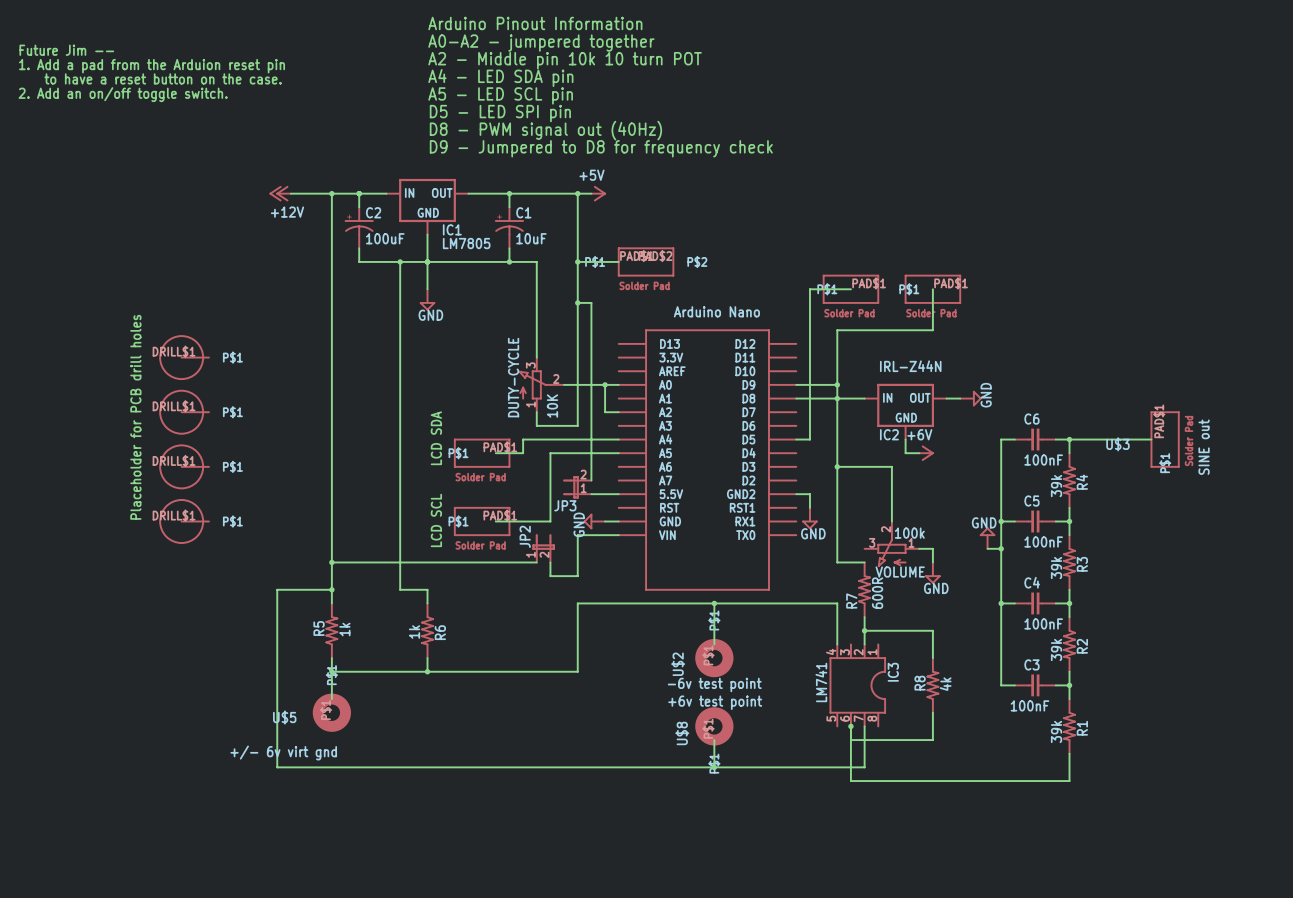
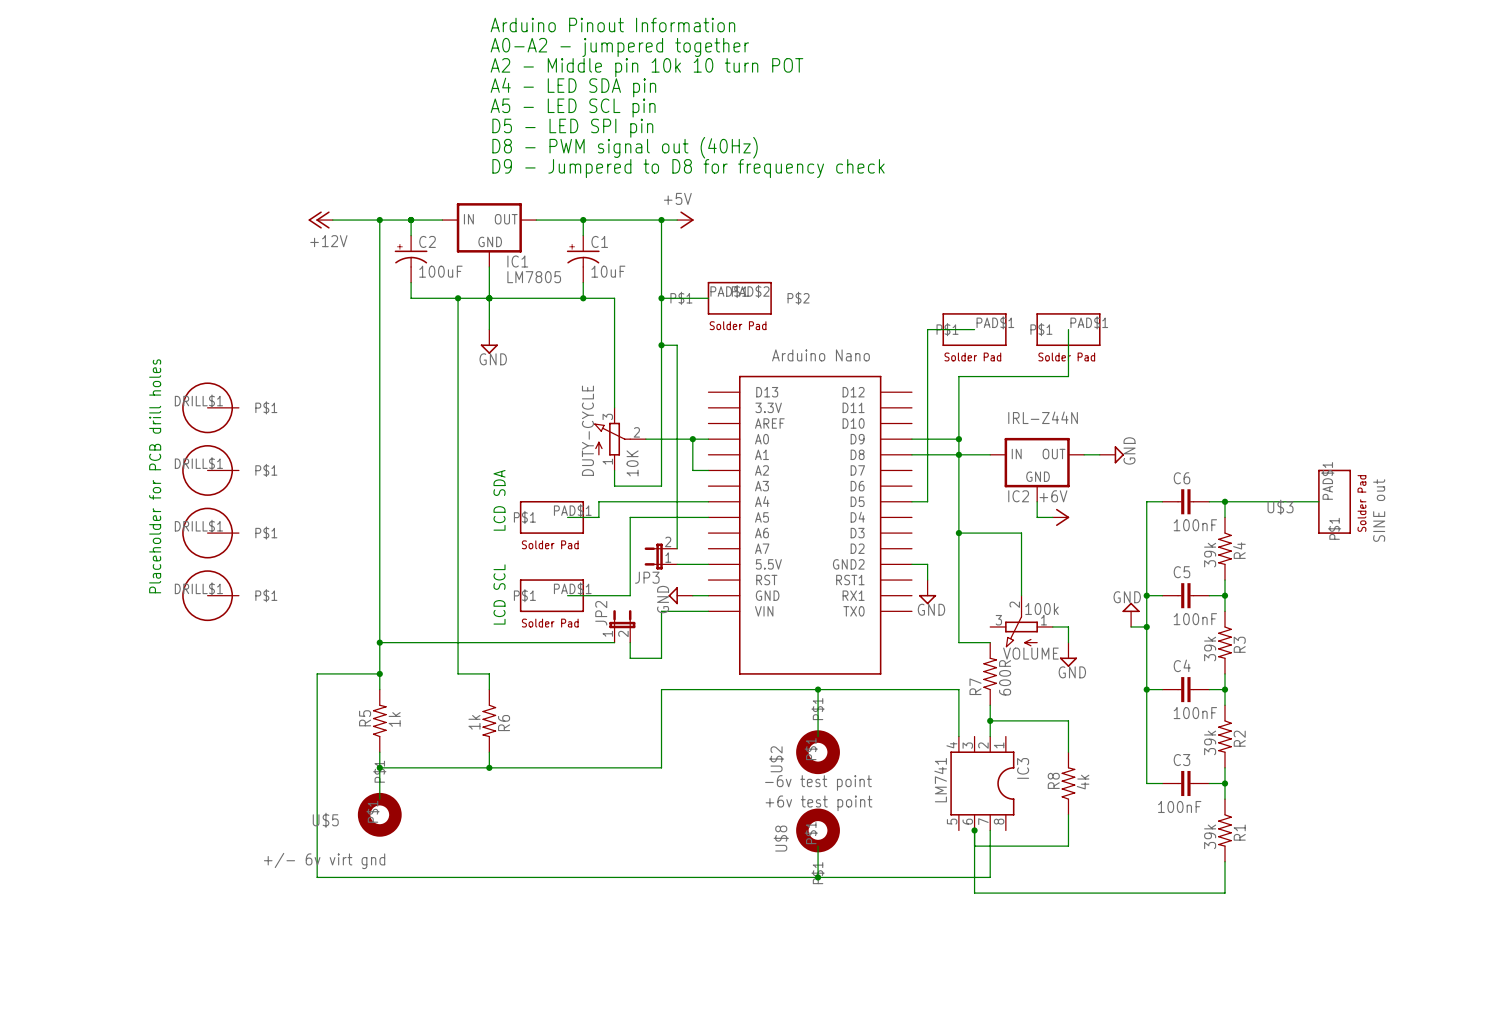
text: Future Jim -- (66, 50) -> none
text: 1. Add a pad from the Arduion reset pin (152, 66) -> none
text: to have a reset button on the case. (163, 78) -> none
text: 2. Add an on/off toggle switch. (123, 94) -> none

